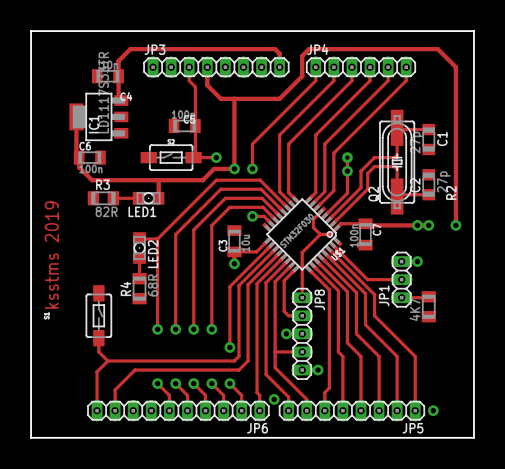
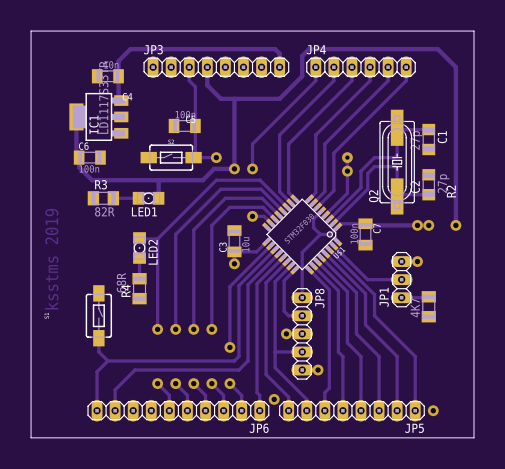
R4 value position: 68R (153, 285) -> 68R (121, 282)

